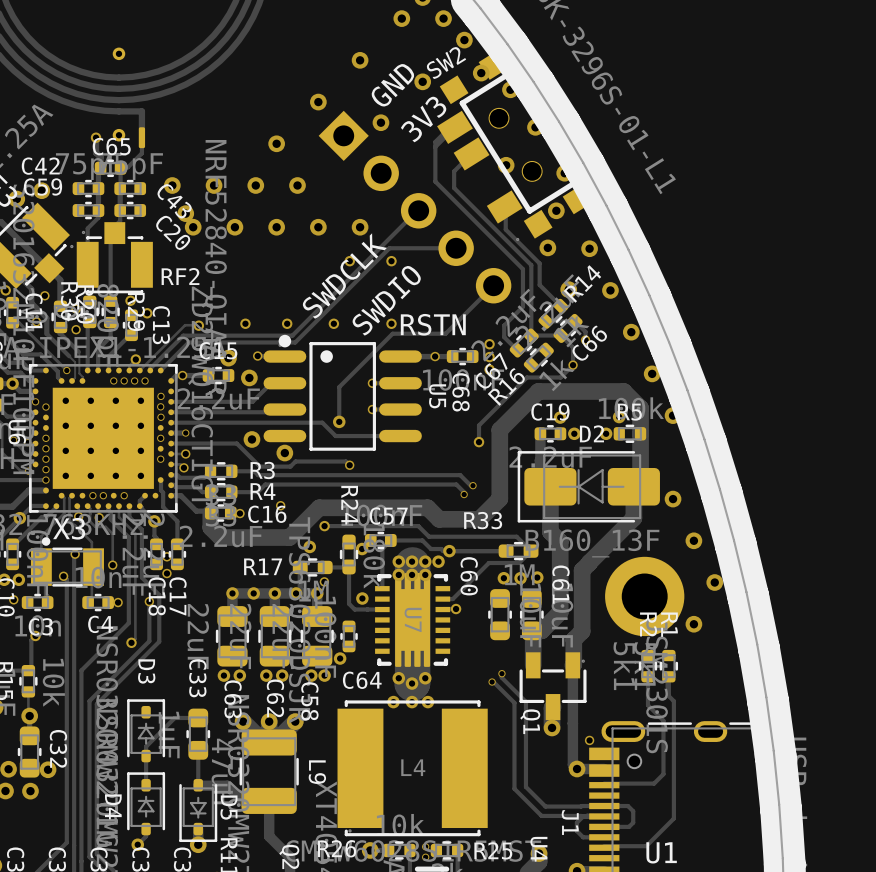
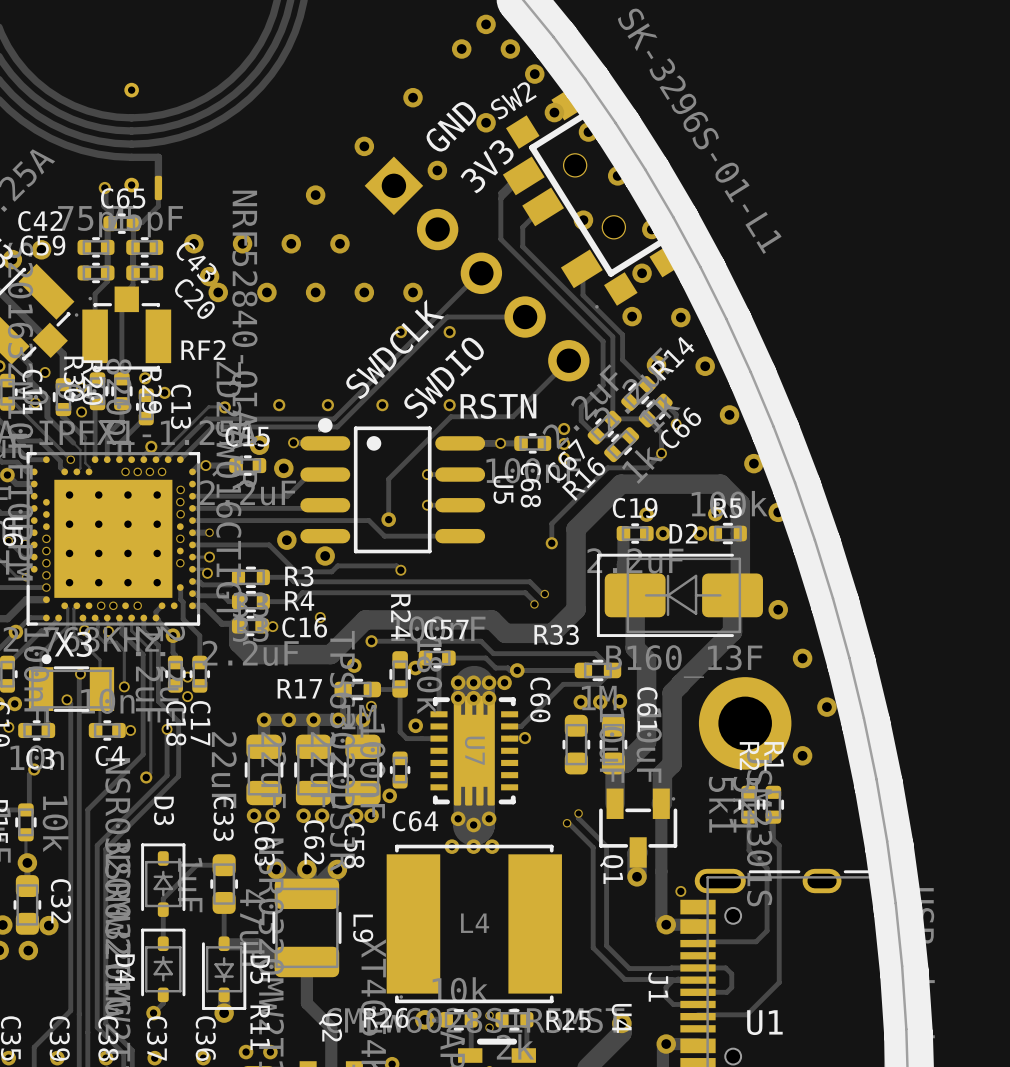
via: (35, 401) -> none
via: (45, 407) -> none

